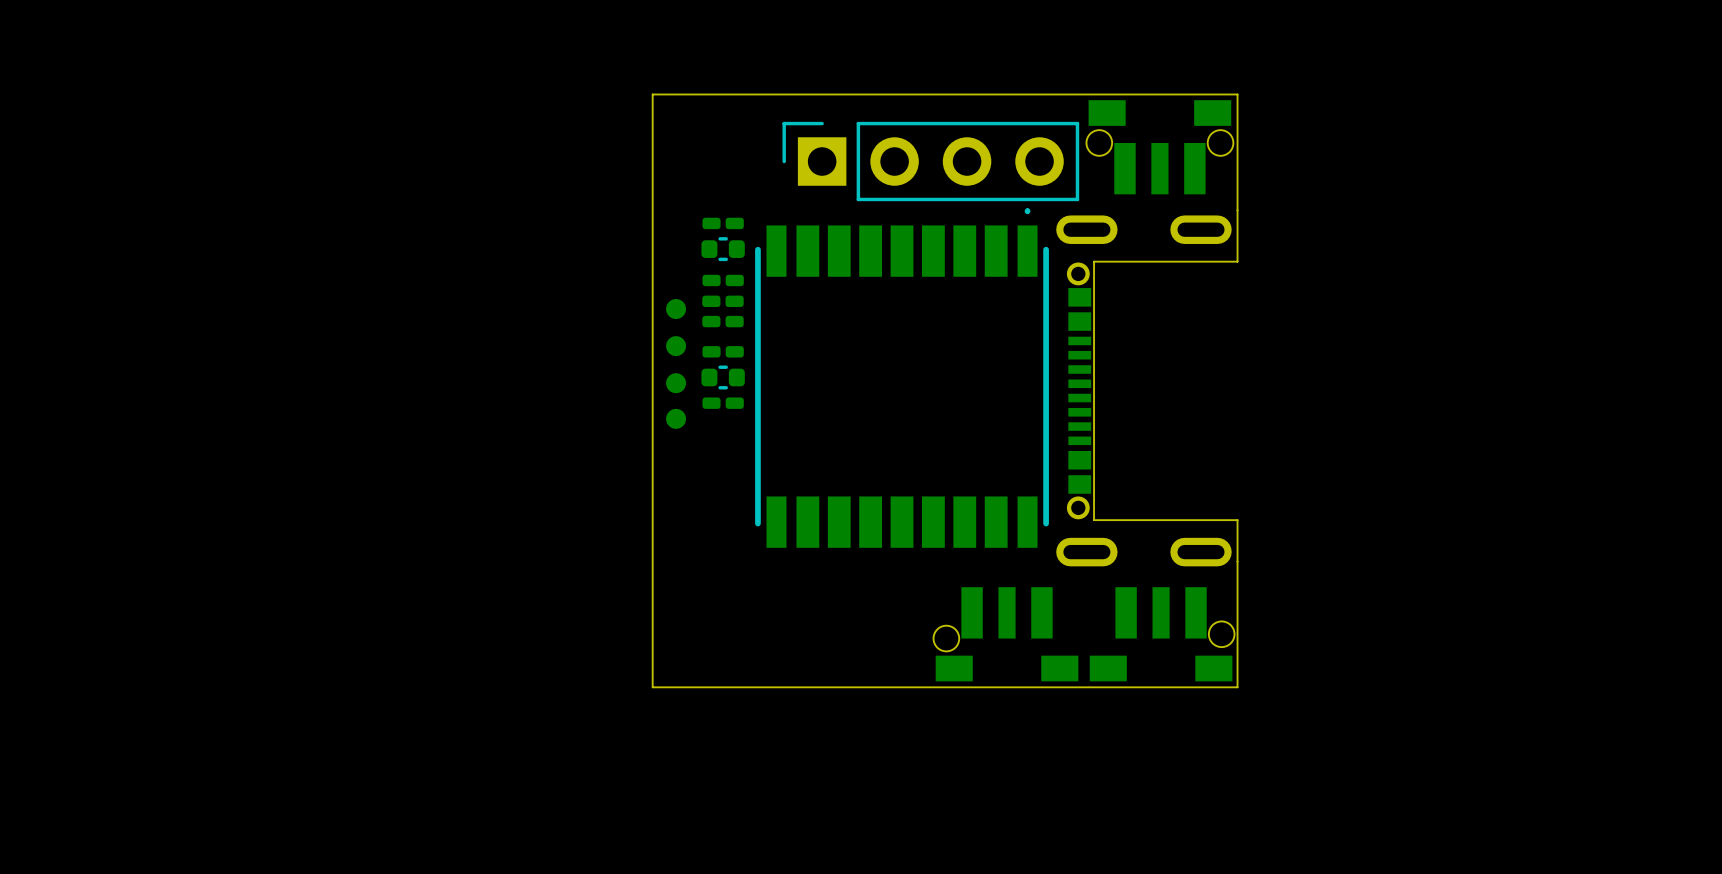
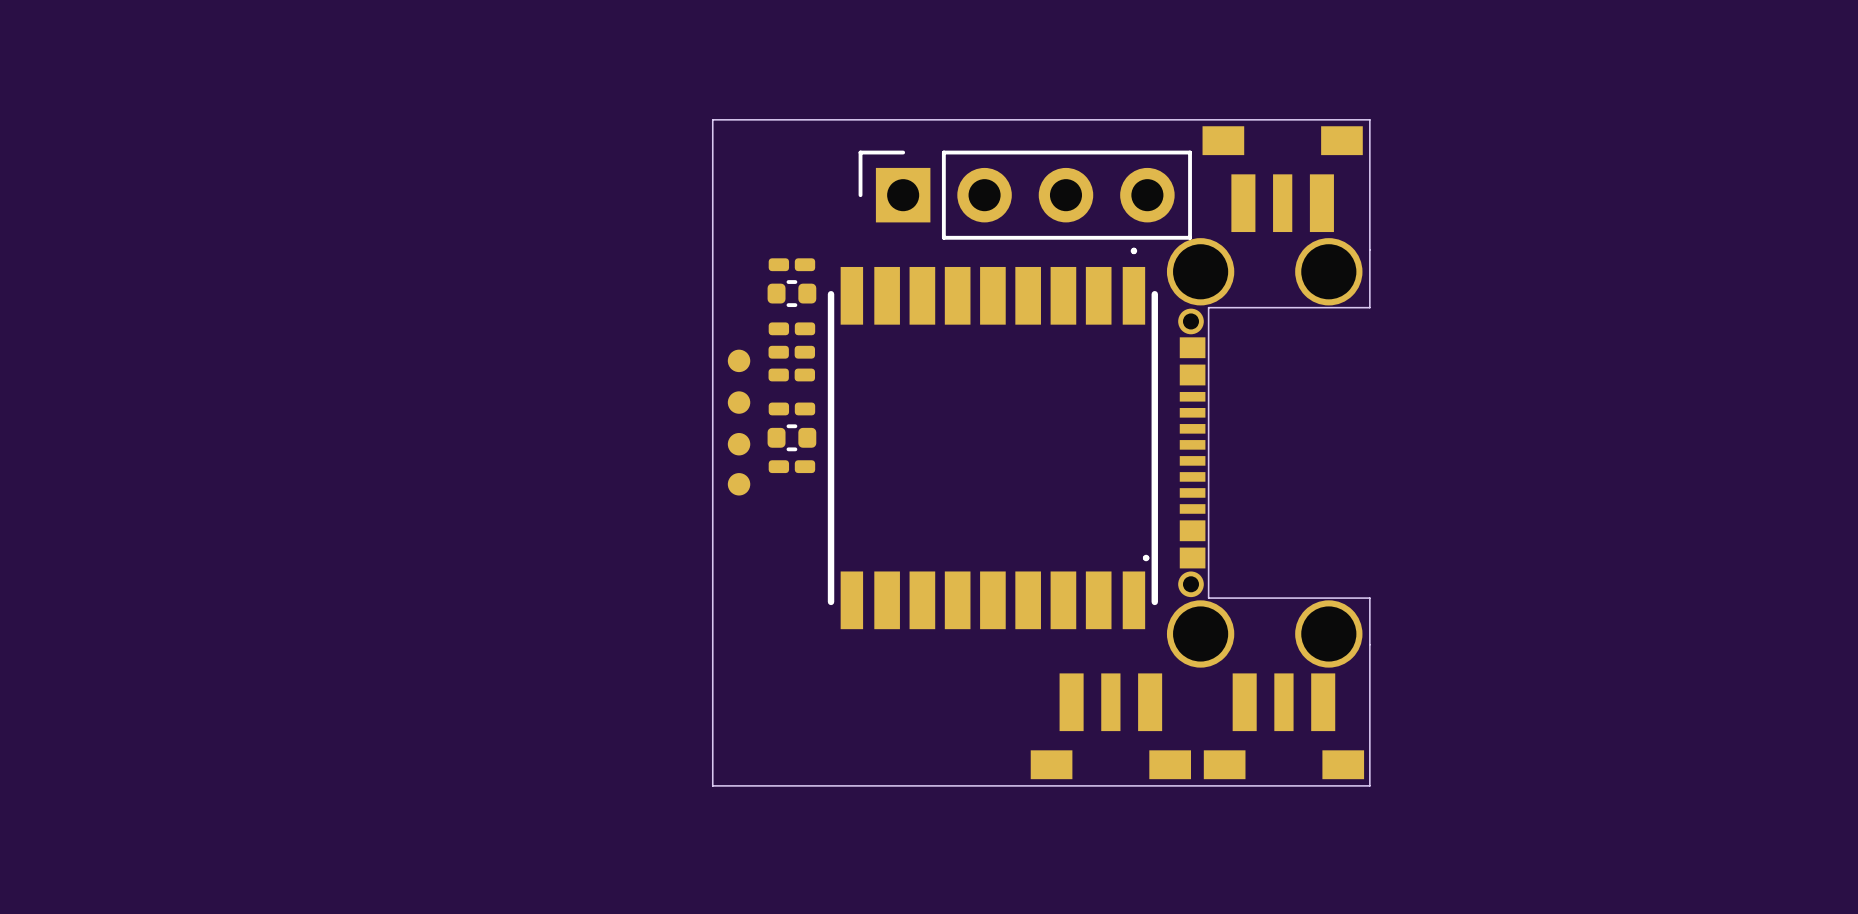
part footprint: [1086, 100, 1234, 195] -> [1202, 126, 1363, 233]
part footprint: [1056, 209, 1239, 567] -> [1142, 238, 1371, 668]
part footprint: [933, 587, 1079, 682] -> [1030, 673, 1191, 780]
part footprint: [1089, 587, 1235, 682] -> [1203, 673, 1365, 780]

